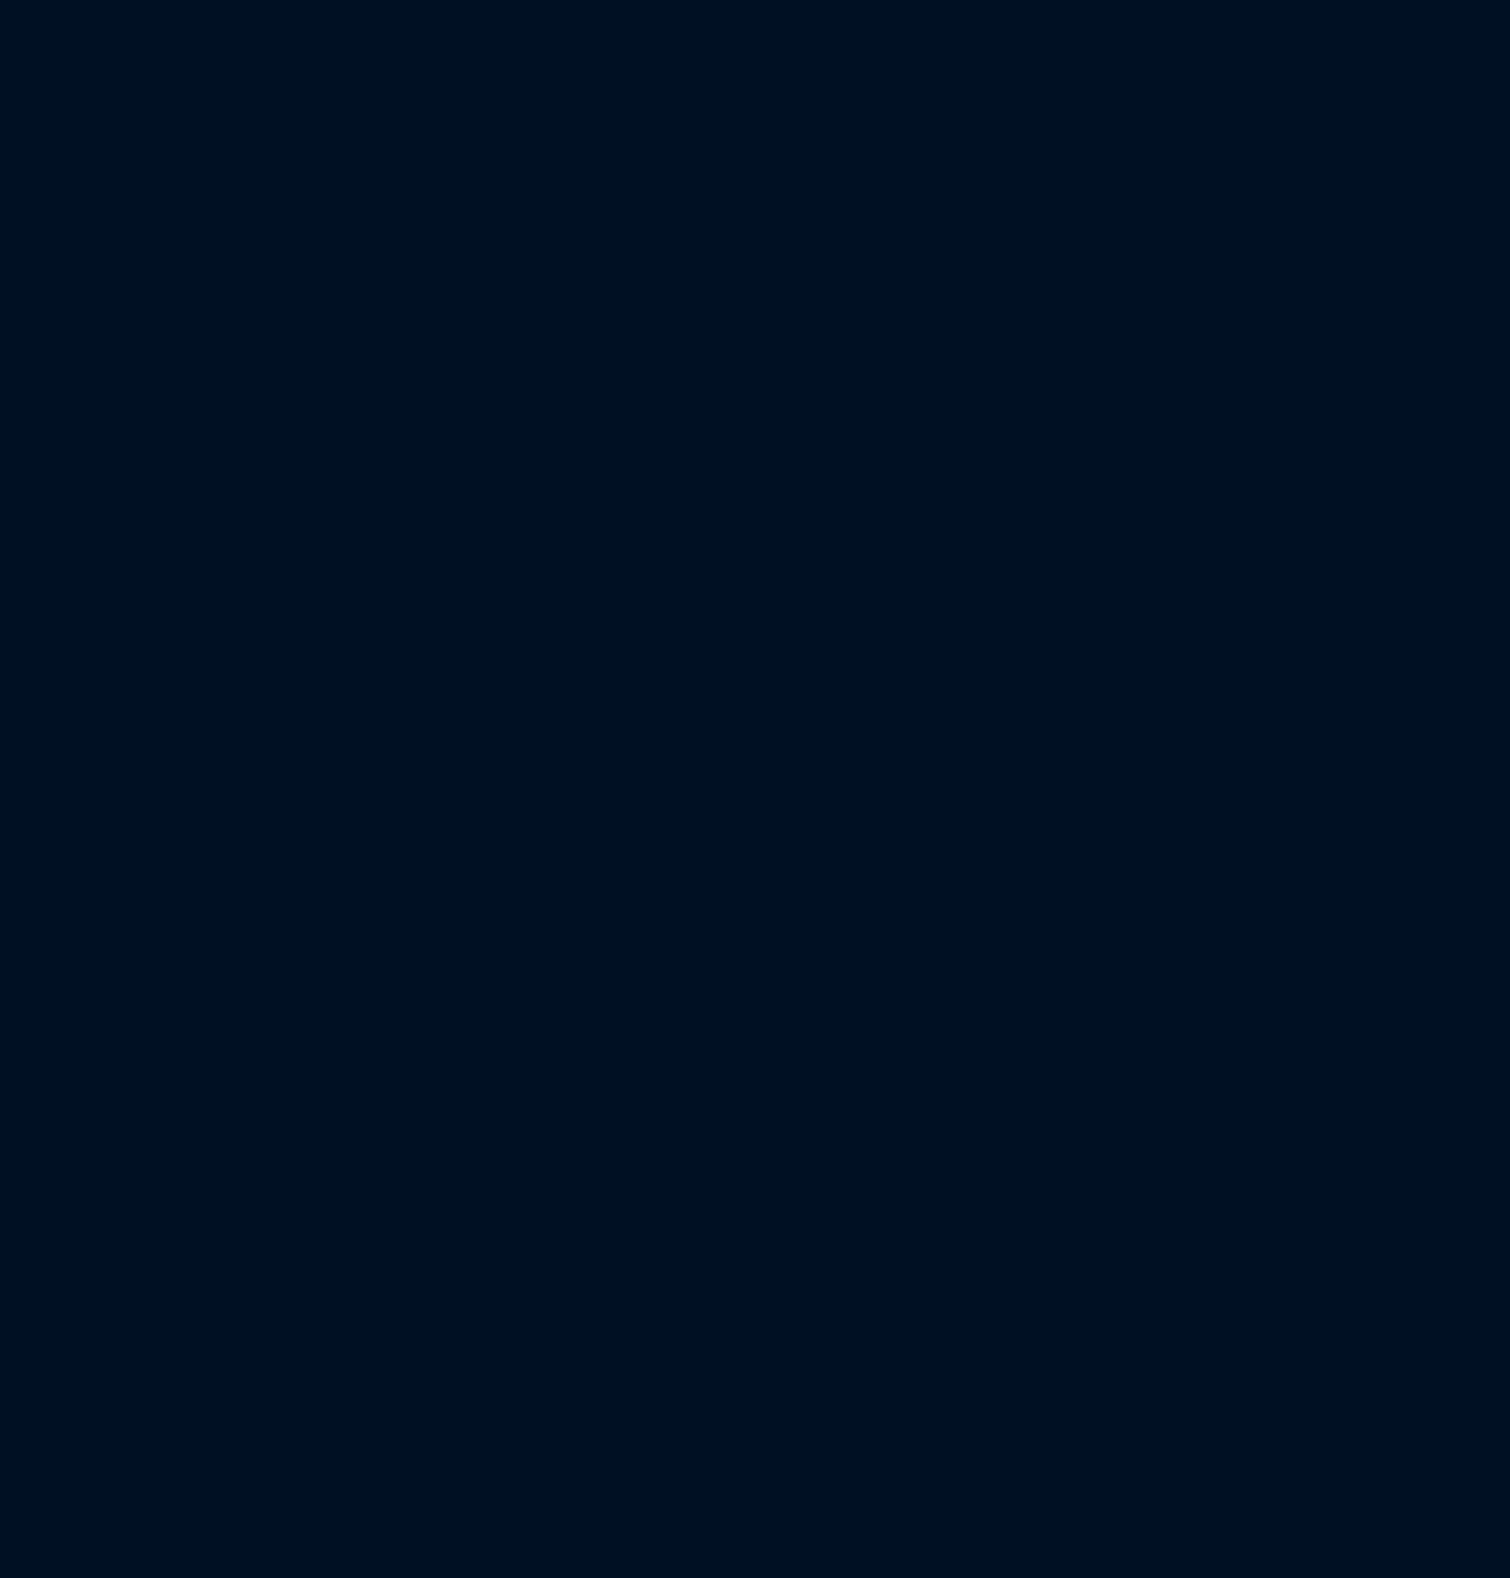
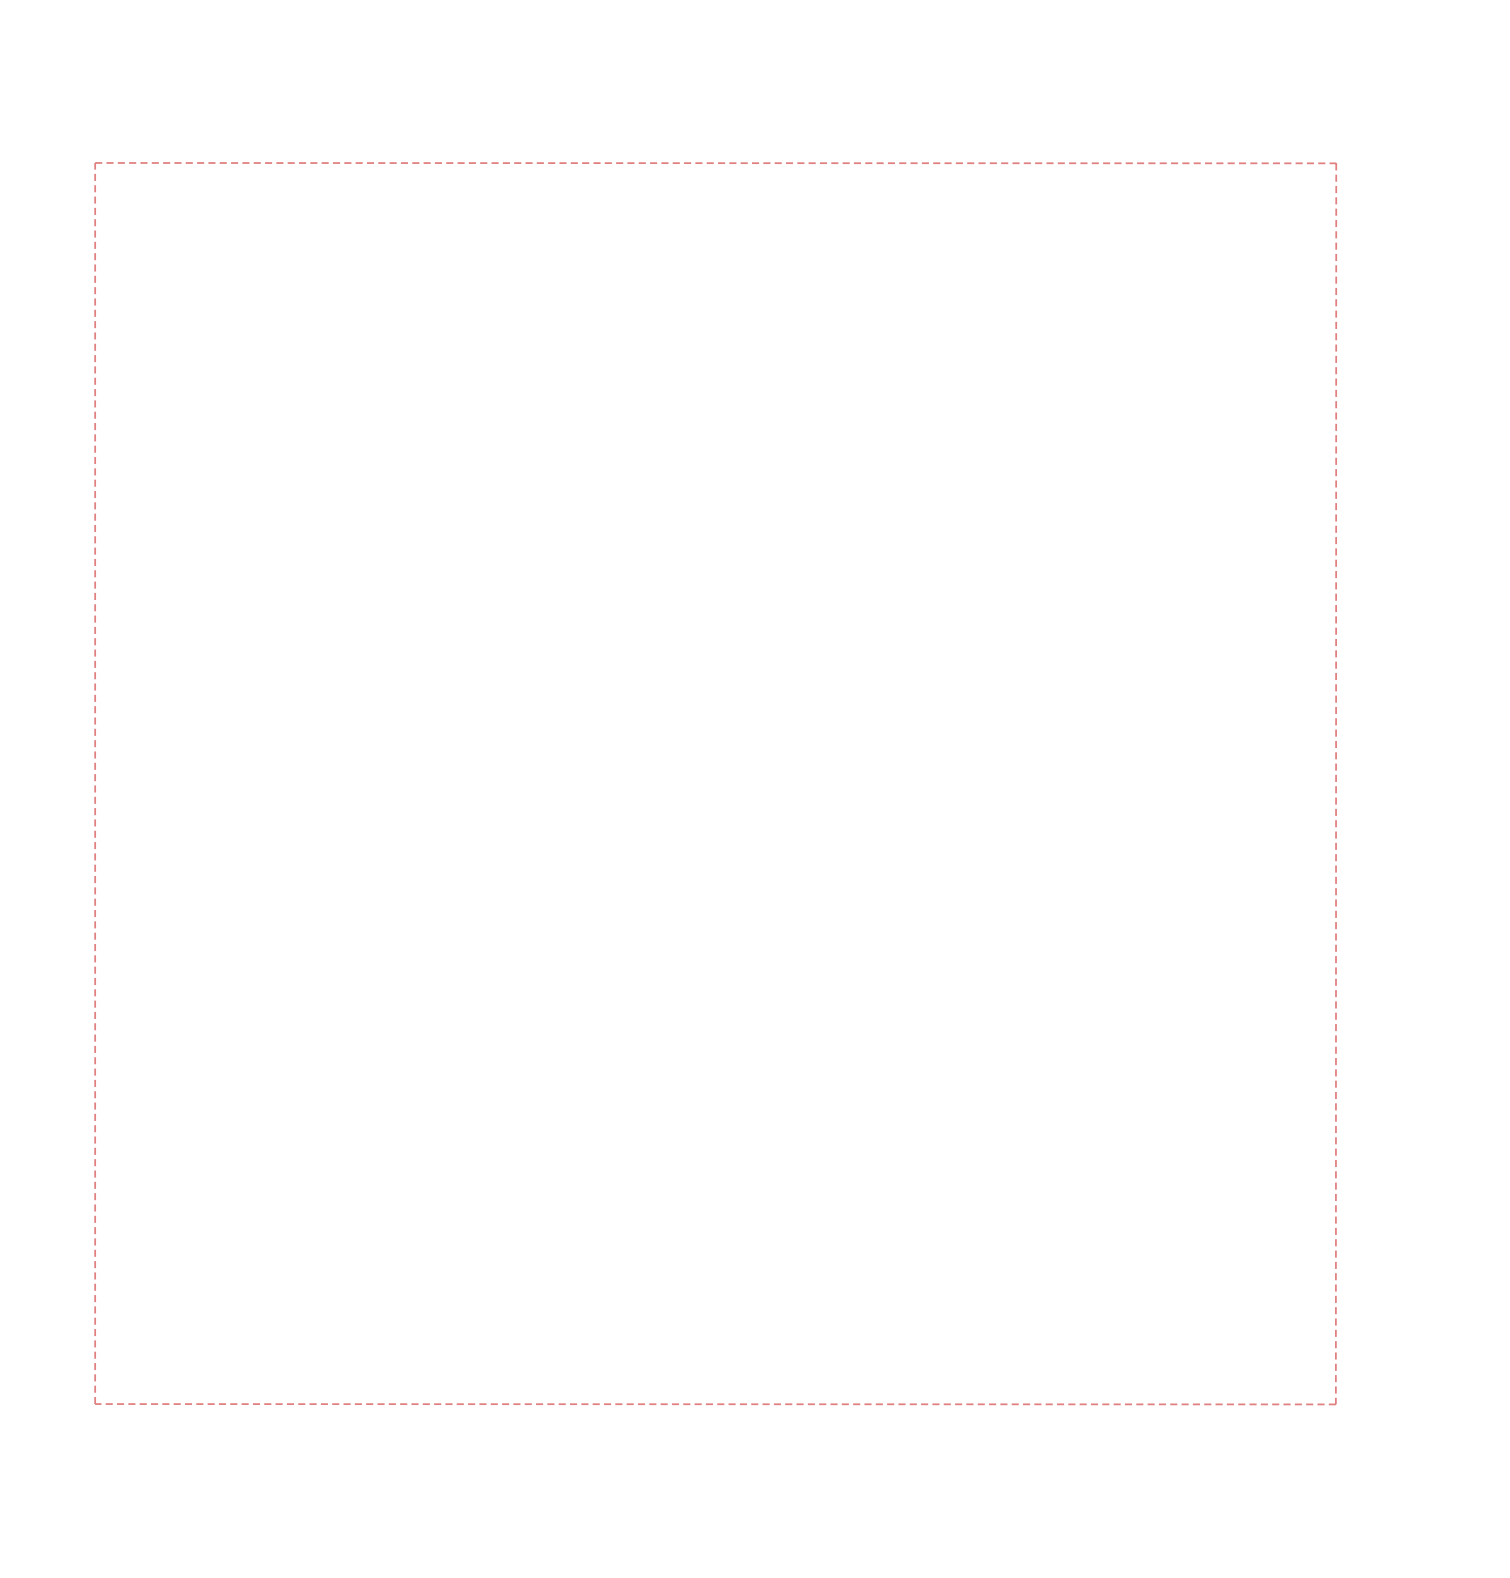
zone outline: none -> (95, 162) (95, 1404) (1335, 1404) (1336, 163) (95, 162)

